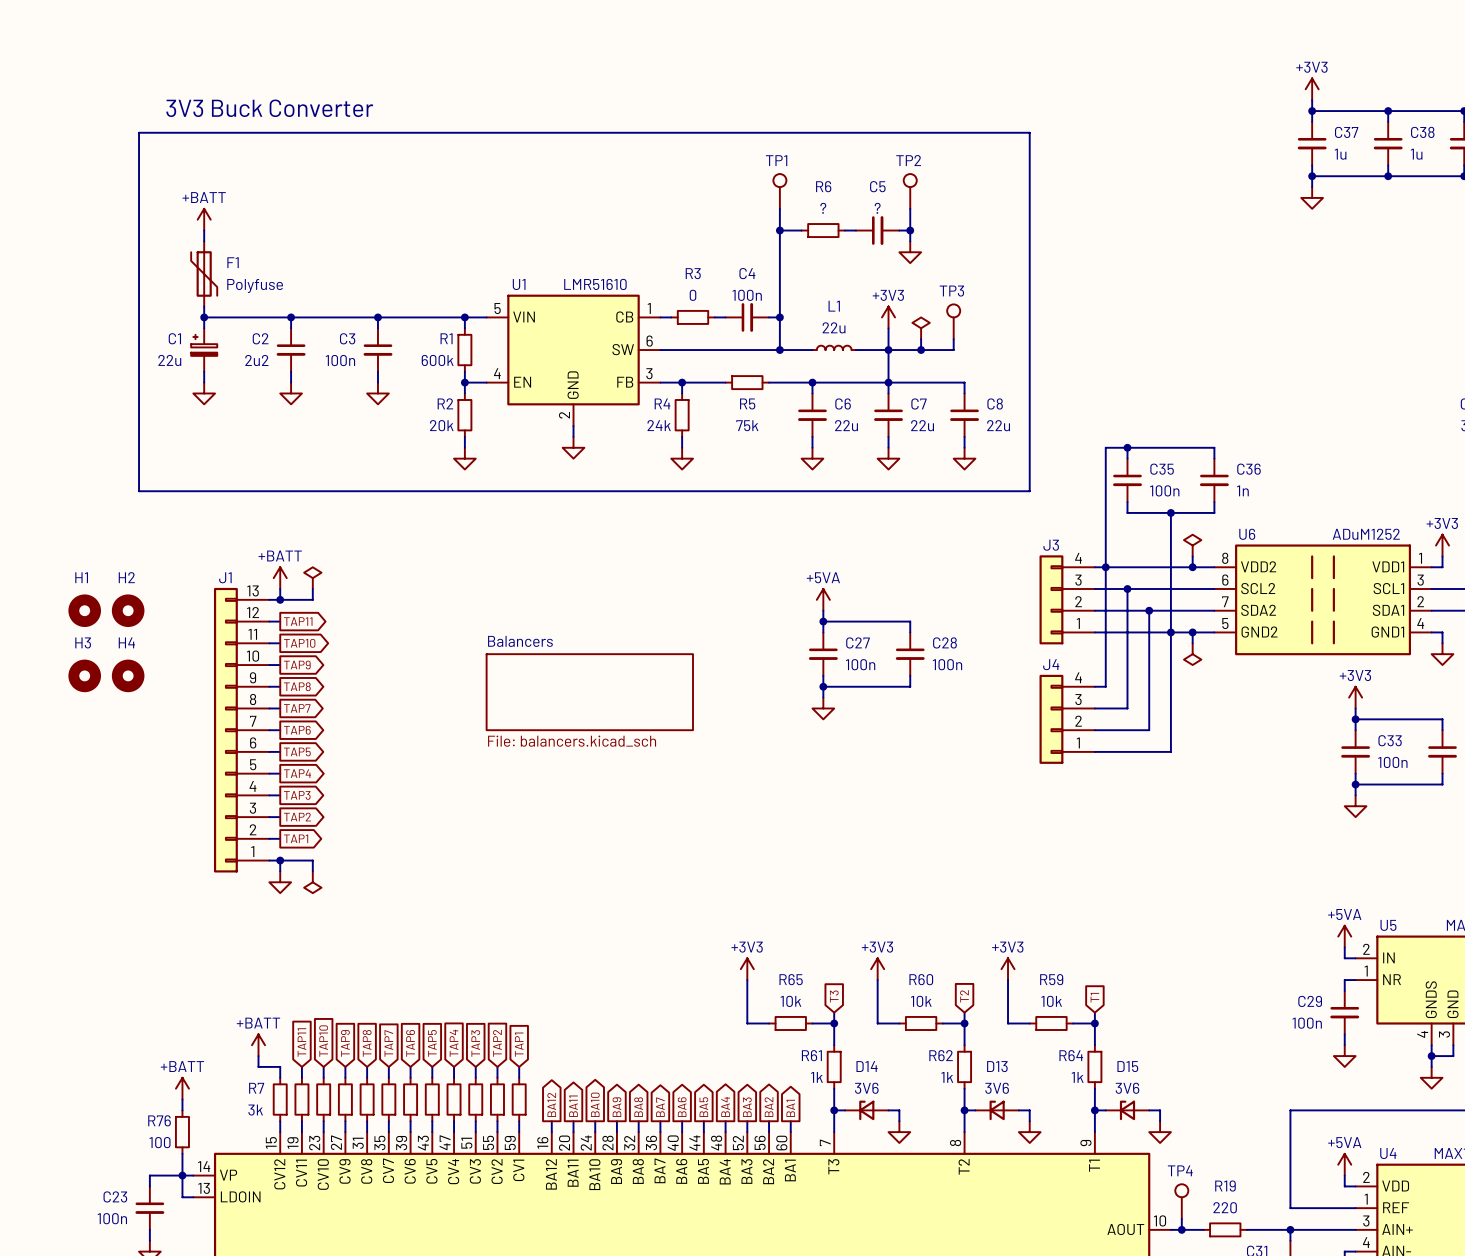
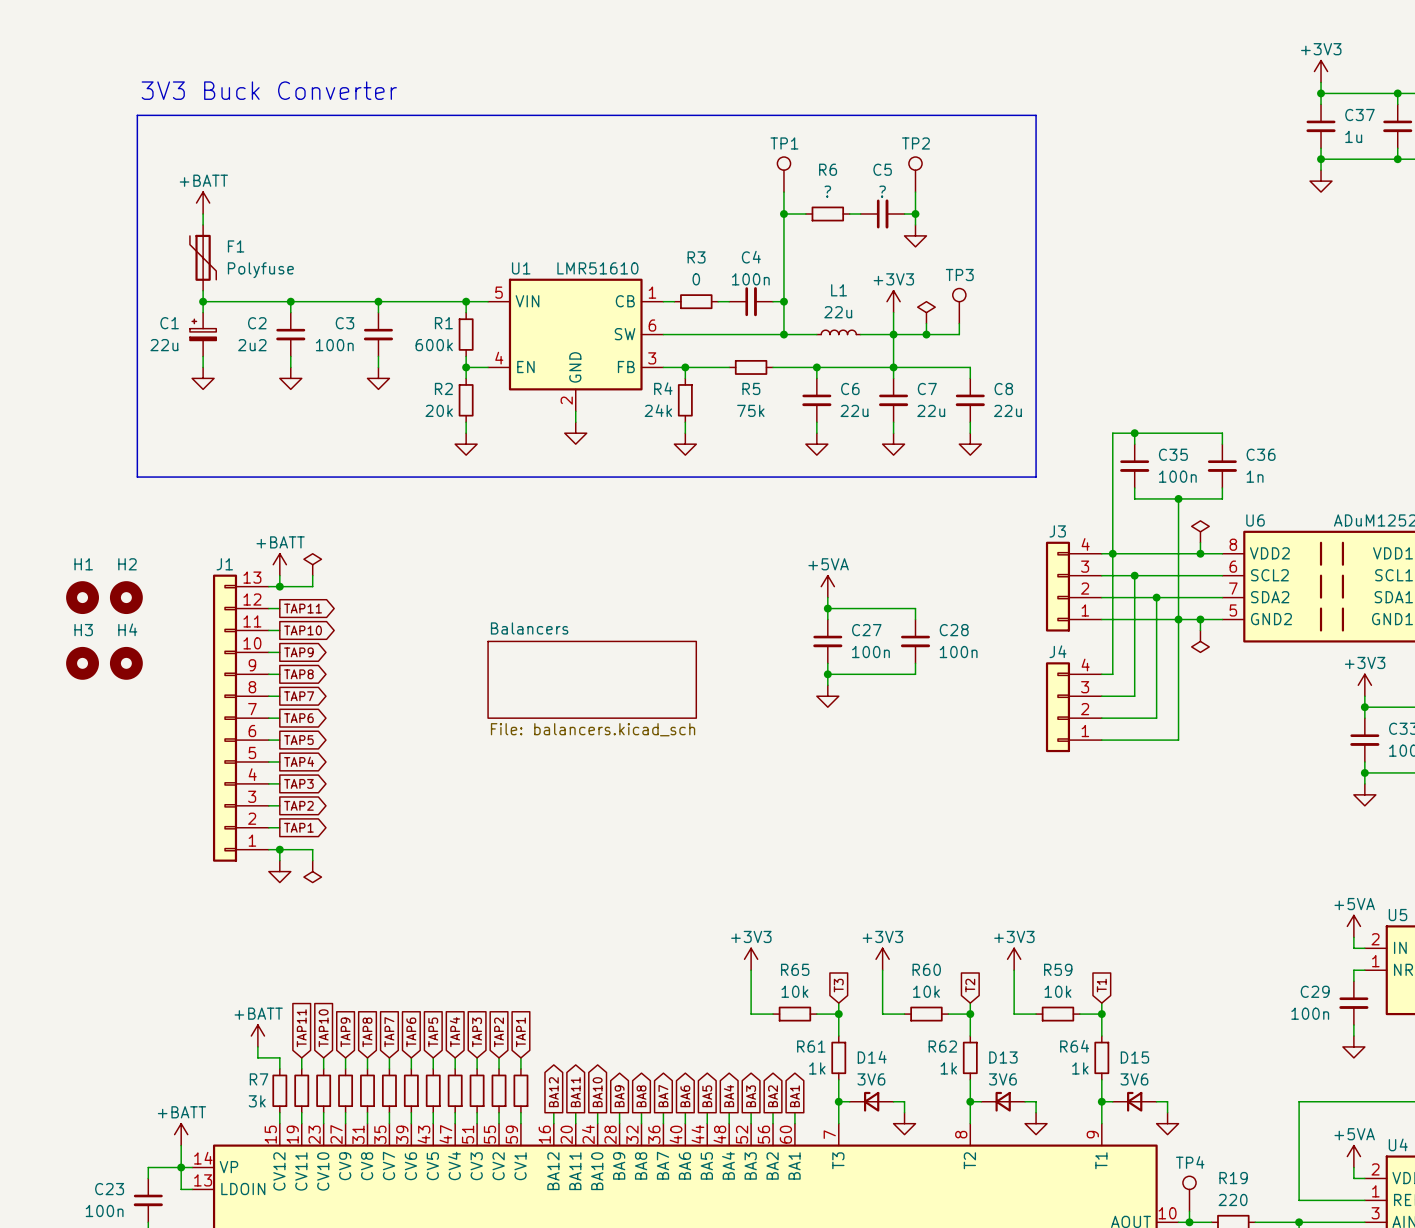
power symbol position: +BATT (182, 1088) -> +BATT (181, 1134)
wire: (182, 1099) (182, 1110) -> none
R76: 100 (182, 1132) -> none

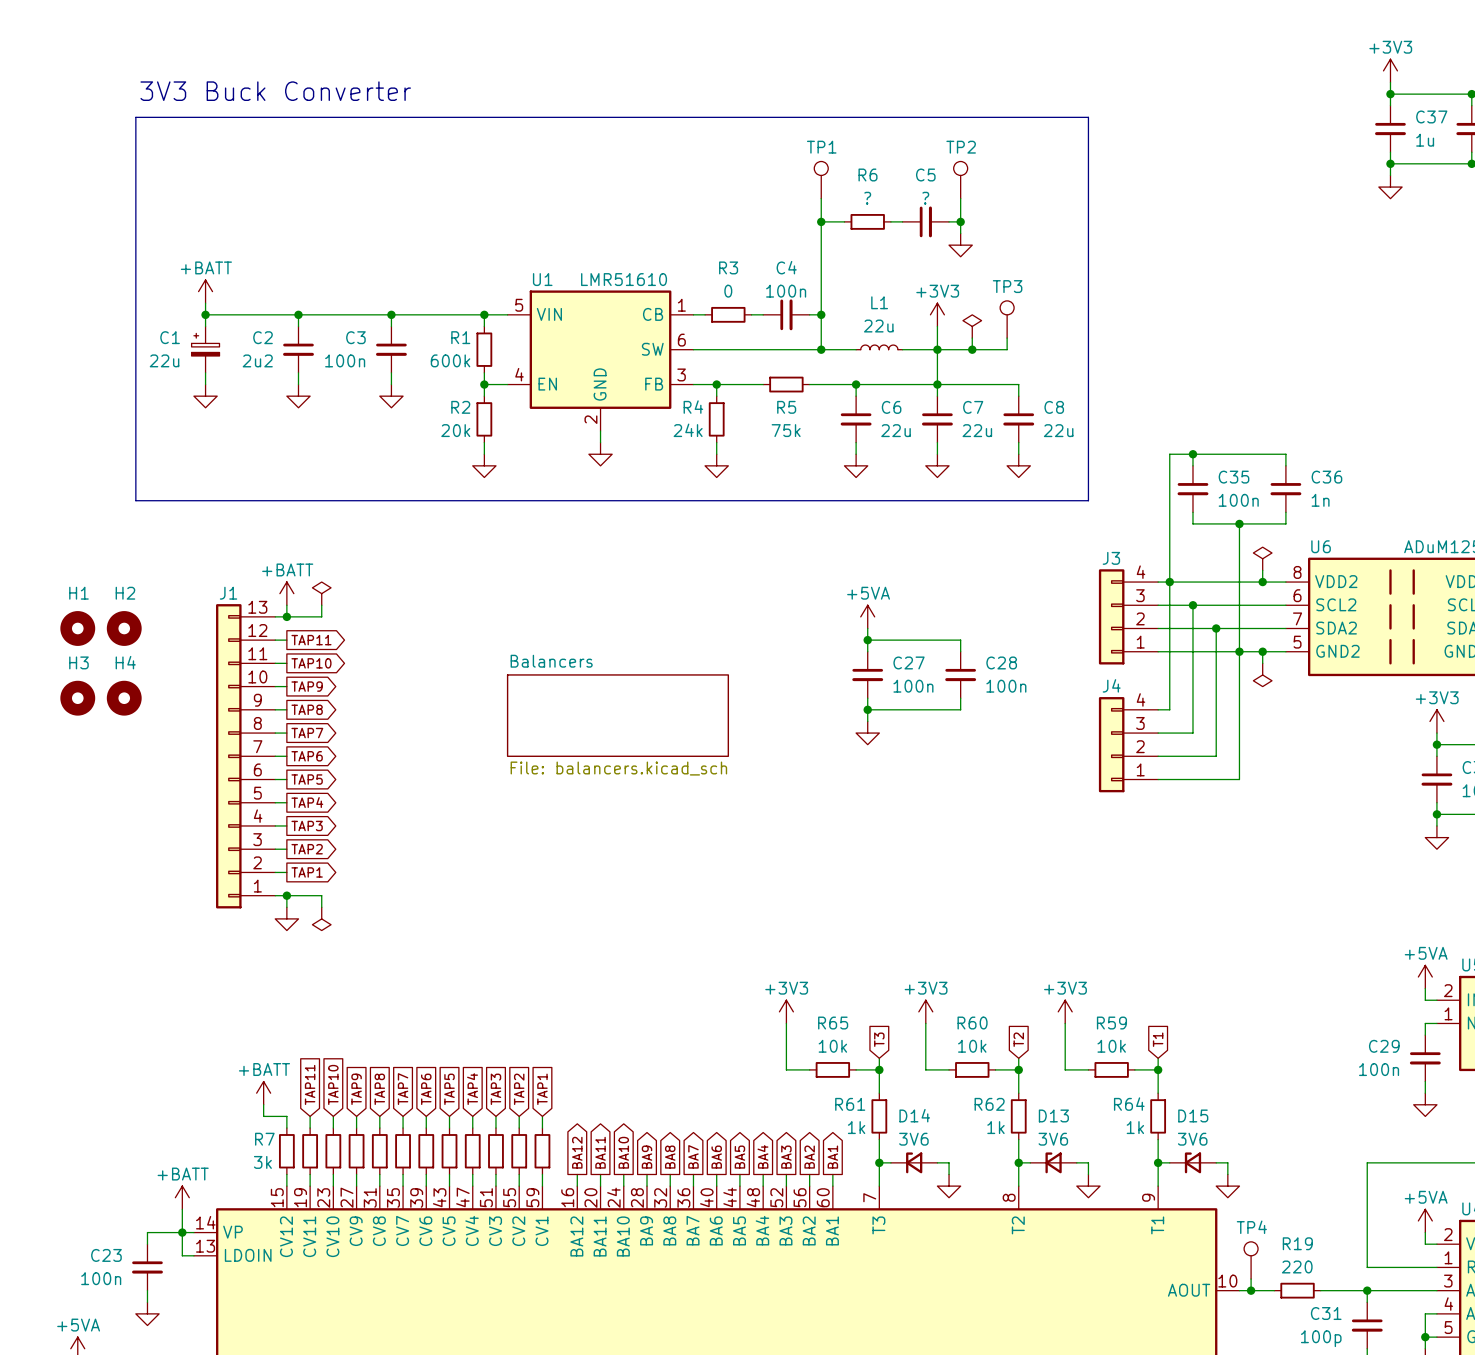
power symbol position: +BATT (203, 203) -> +BATT (205, 291)
wire: (203, 214) (203, 224) -> none
F1: Polyfuse (203, 257) -> none

